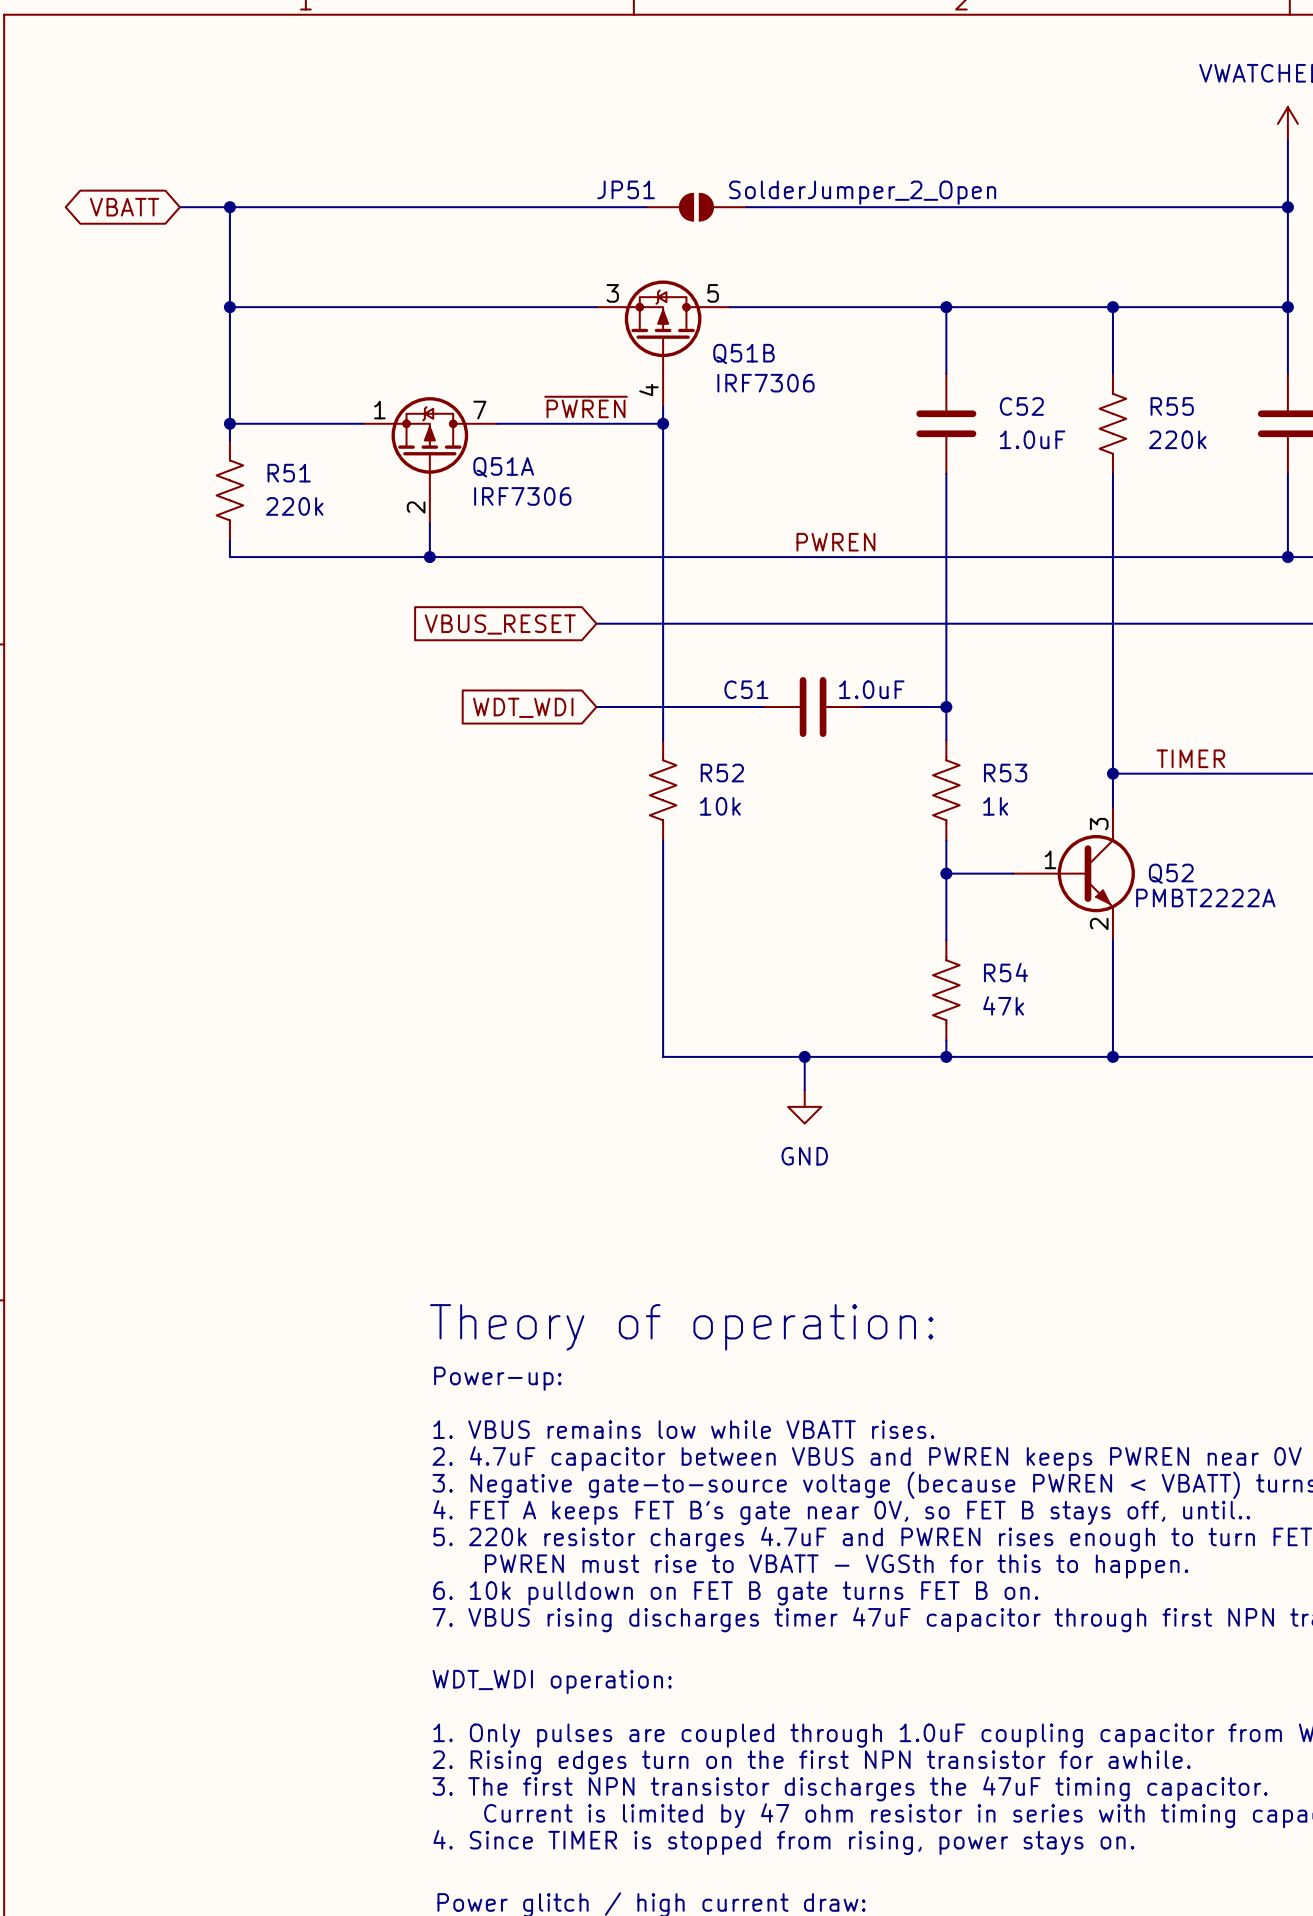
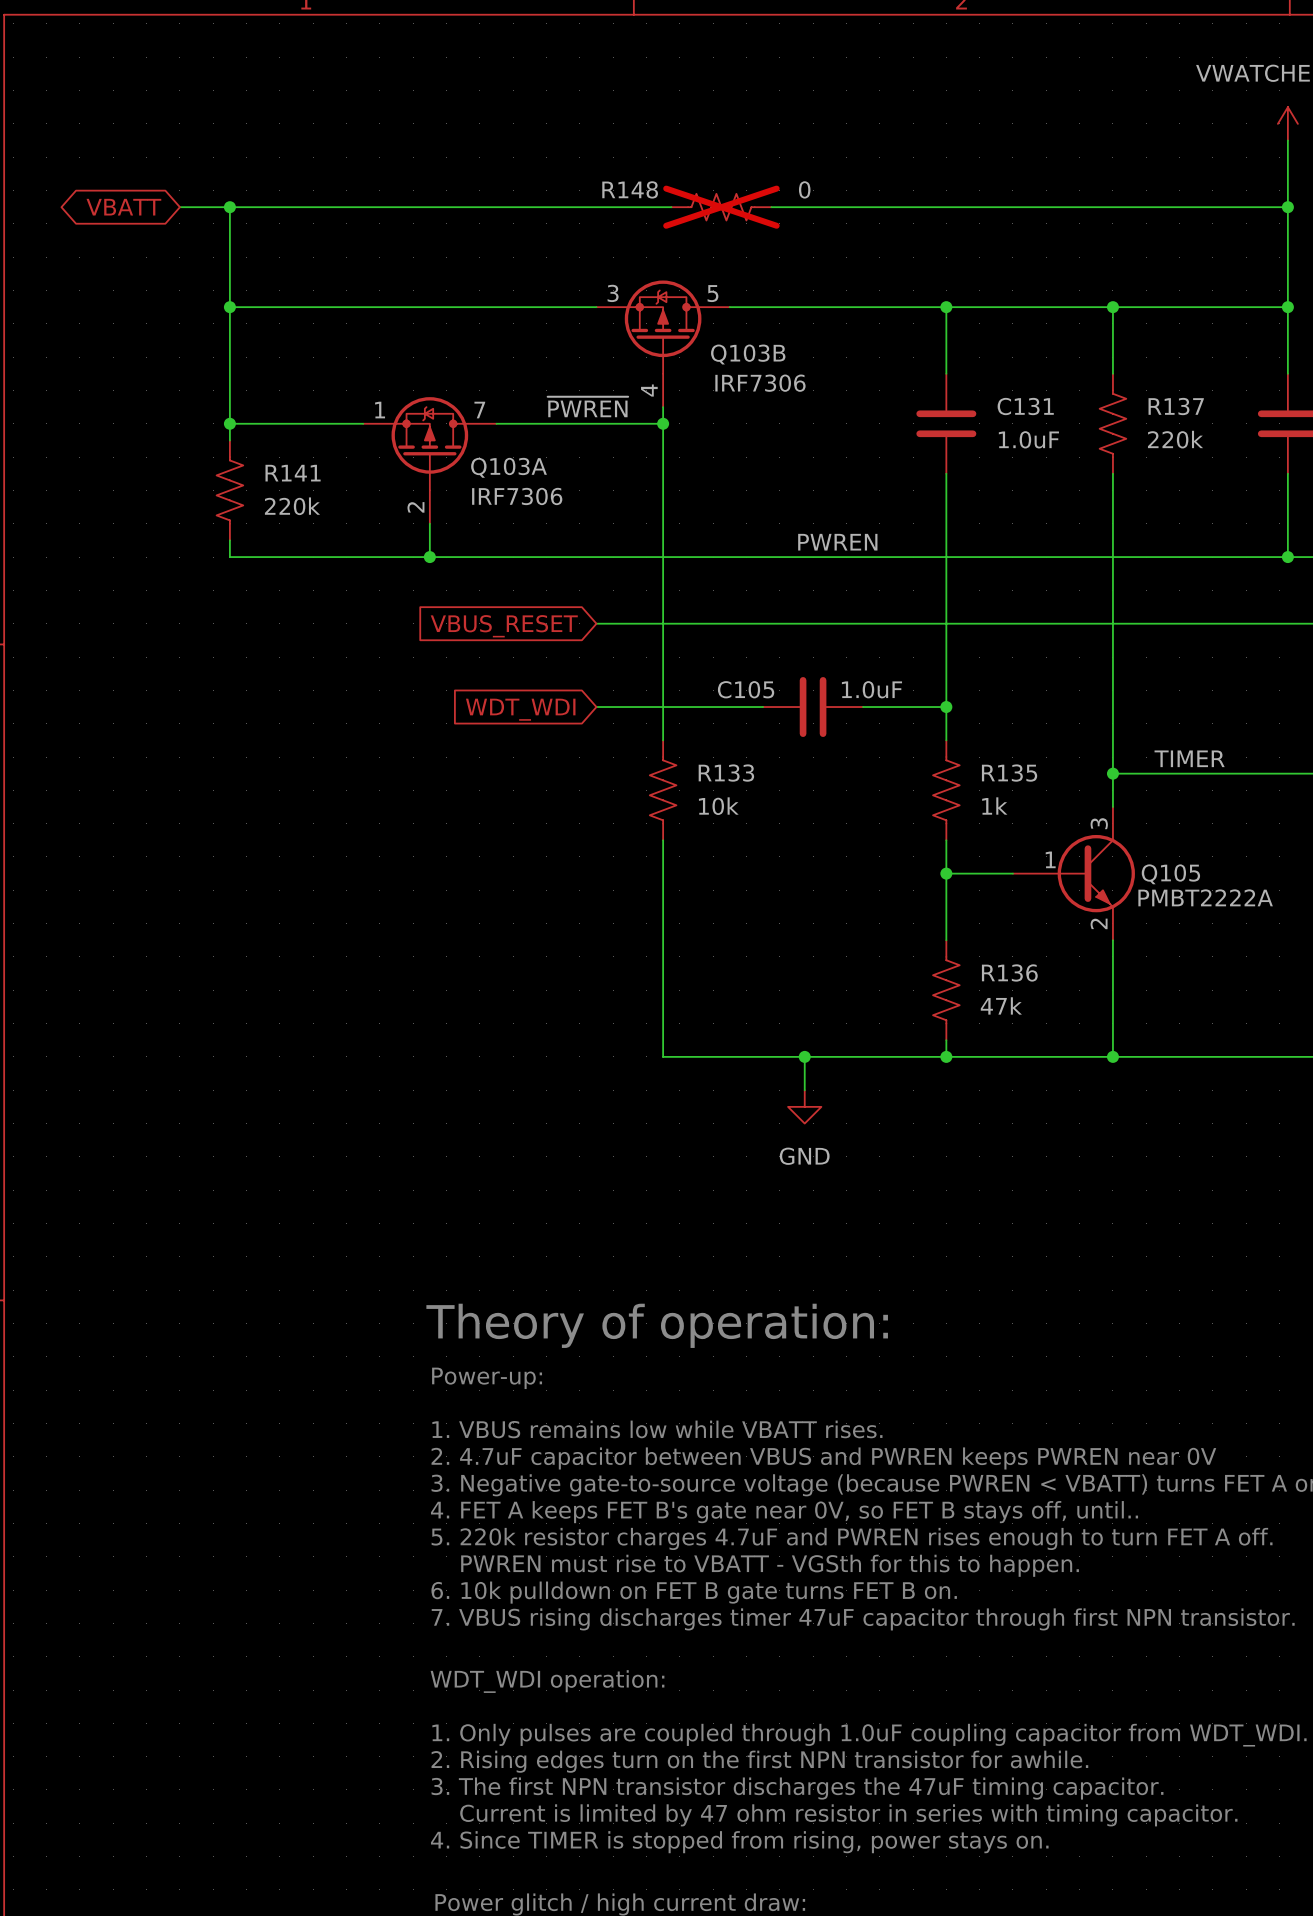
JP51: SolderJumper_2_Open (696, 207) -> none
R148: none -> 0 (721, 207)
Q51B name: Q51B (744, 353) -> Q103B (748, 354)
C52 name: C52 (1021, 406) -> C131 (1025, 406)
R55 name: R55 (1172, 406) -> R137 (1176, 406)
Q51A name: Q51A (503, 467) -> Q103A (509, 467)
R51 name: R51 (289, 473) -> R141 (293, 473)
C51 name: C51 (746, 689) -> C105 (746, 689)
R52 name: R52 (722, 773) -> R133 (726, 773)
R53 name: R53 (1005, 773) -> R135 (1009, 773)
Q52 name: Q52 (1171, 873) -> Q105 (1170, 874)
R54 name: R54 (1005, 972) -> R136 (1009, 972)

